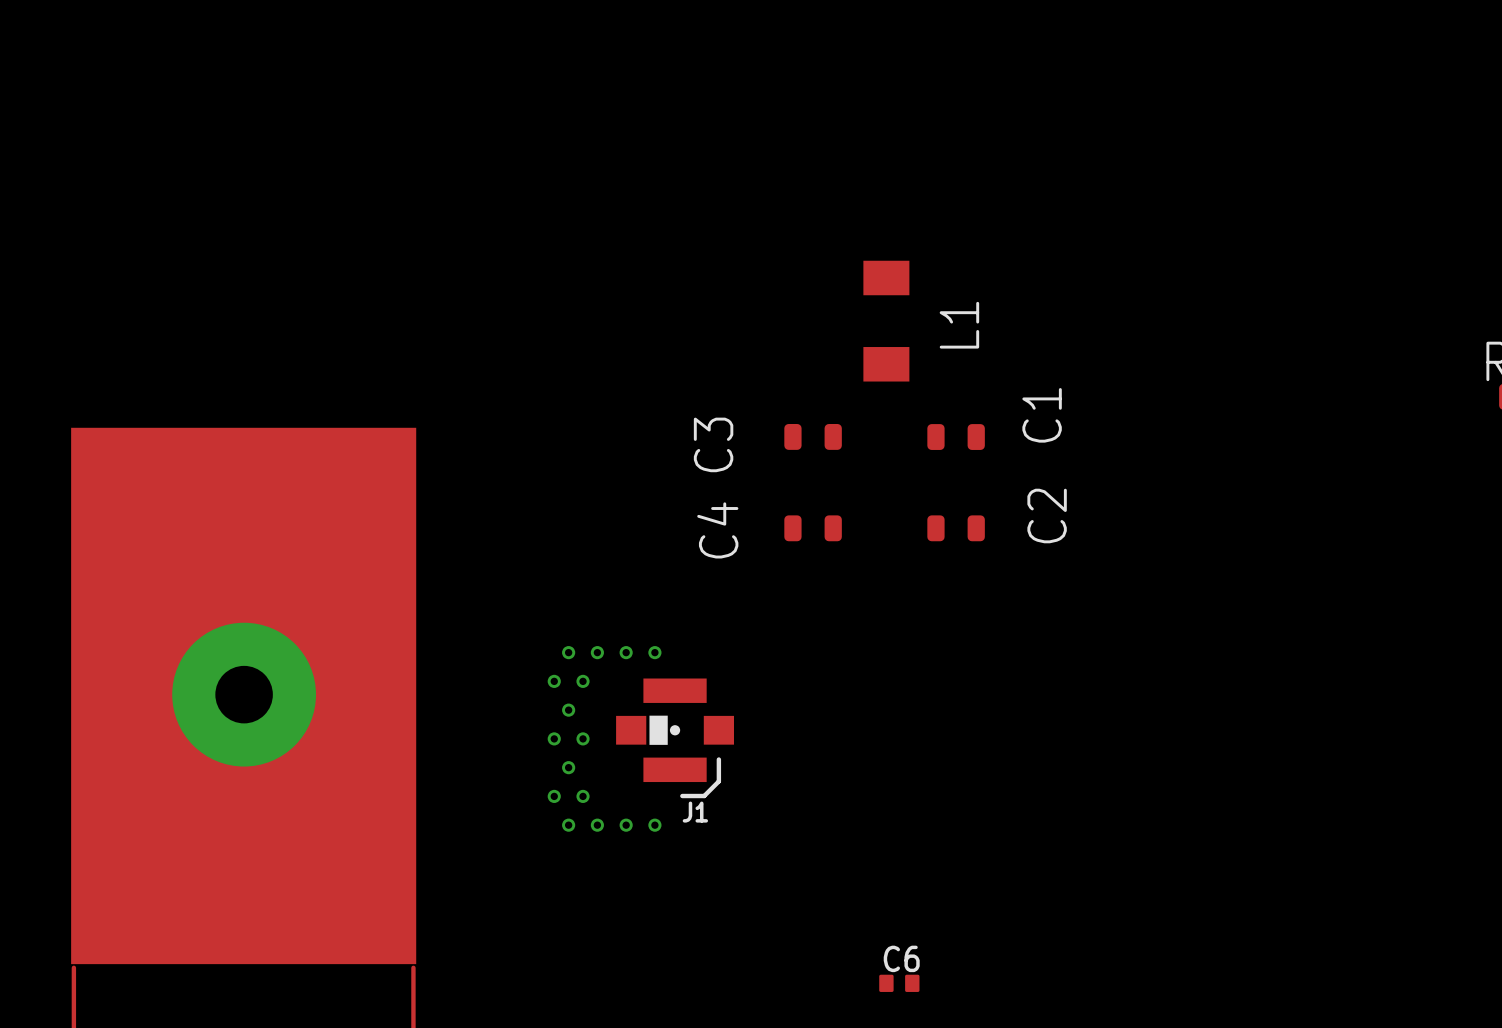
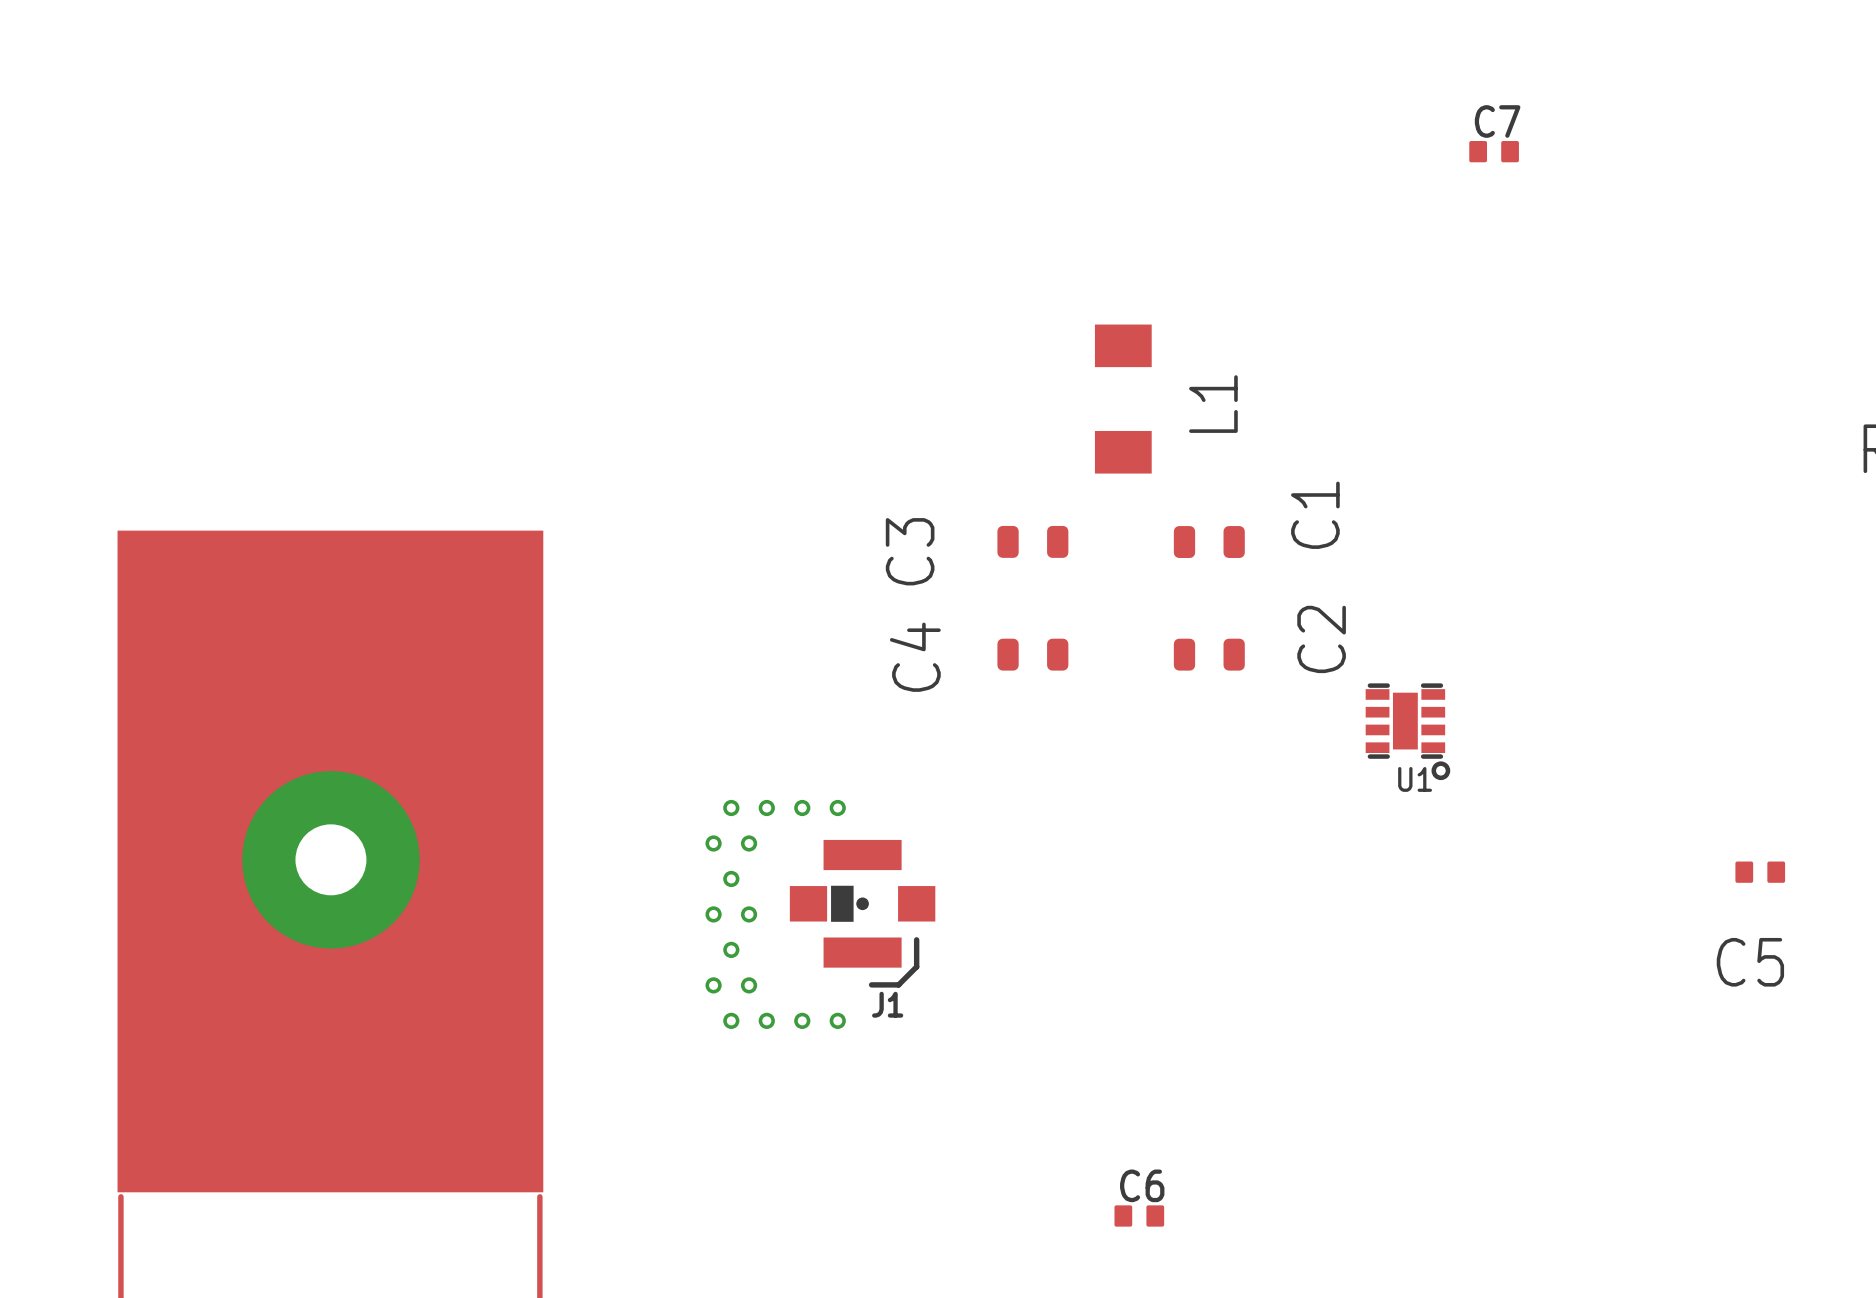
C7: none -> (1494, 151)
U1: none -> (1407, 731)
C5: none -> (1760, 872)

